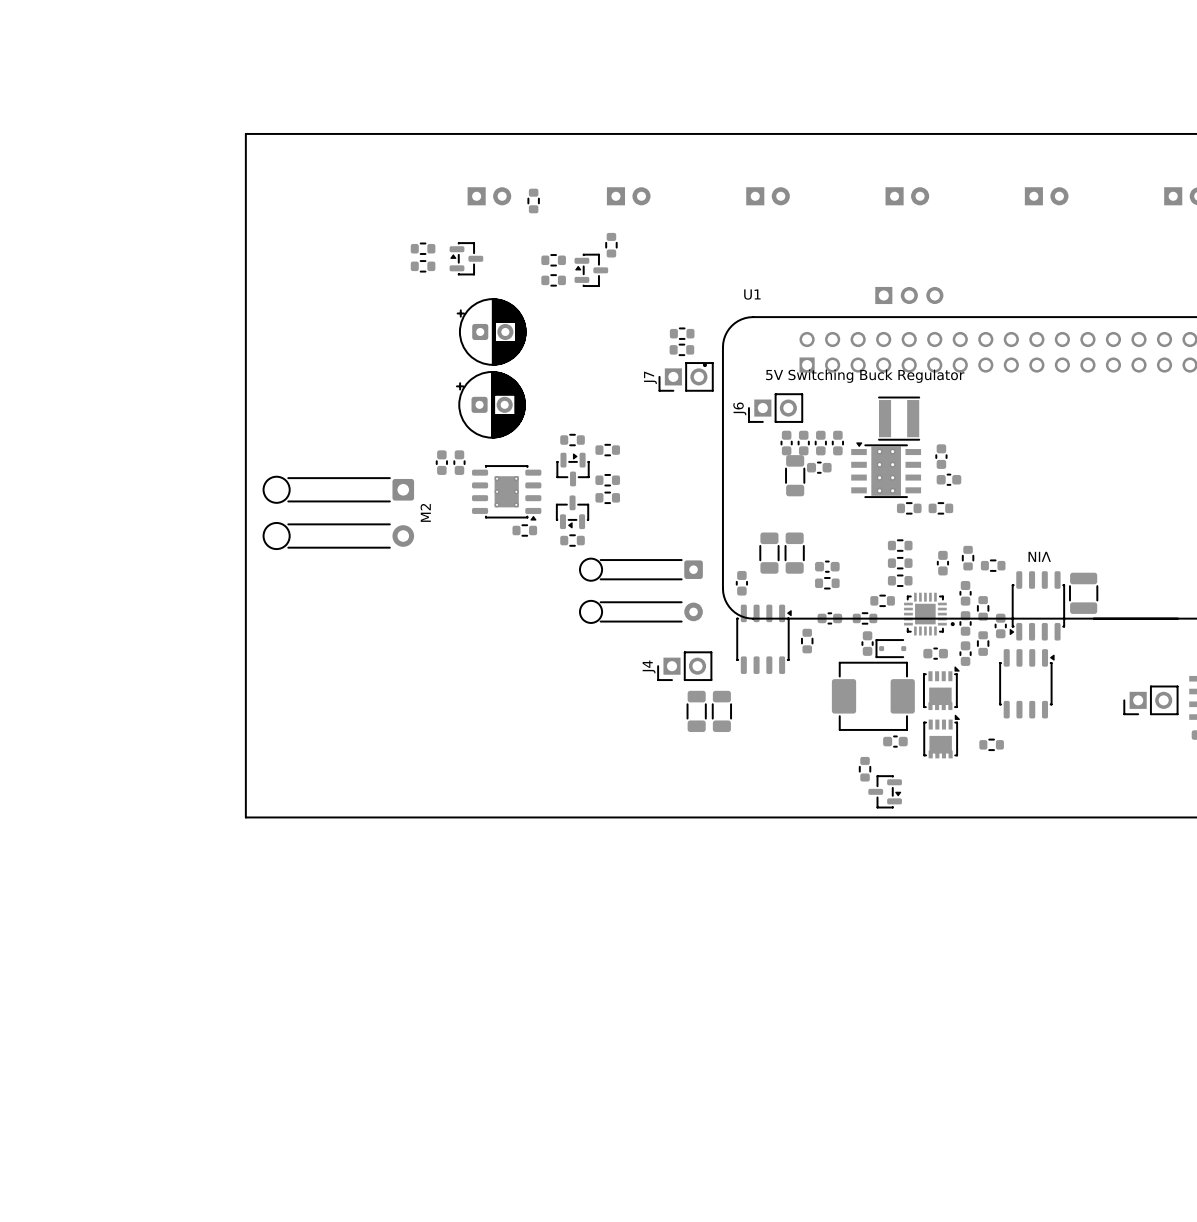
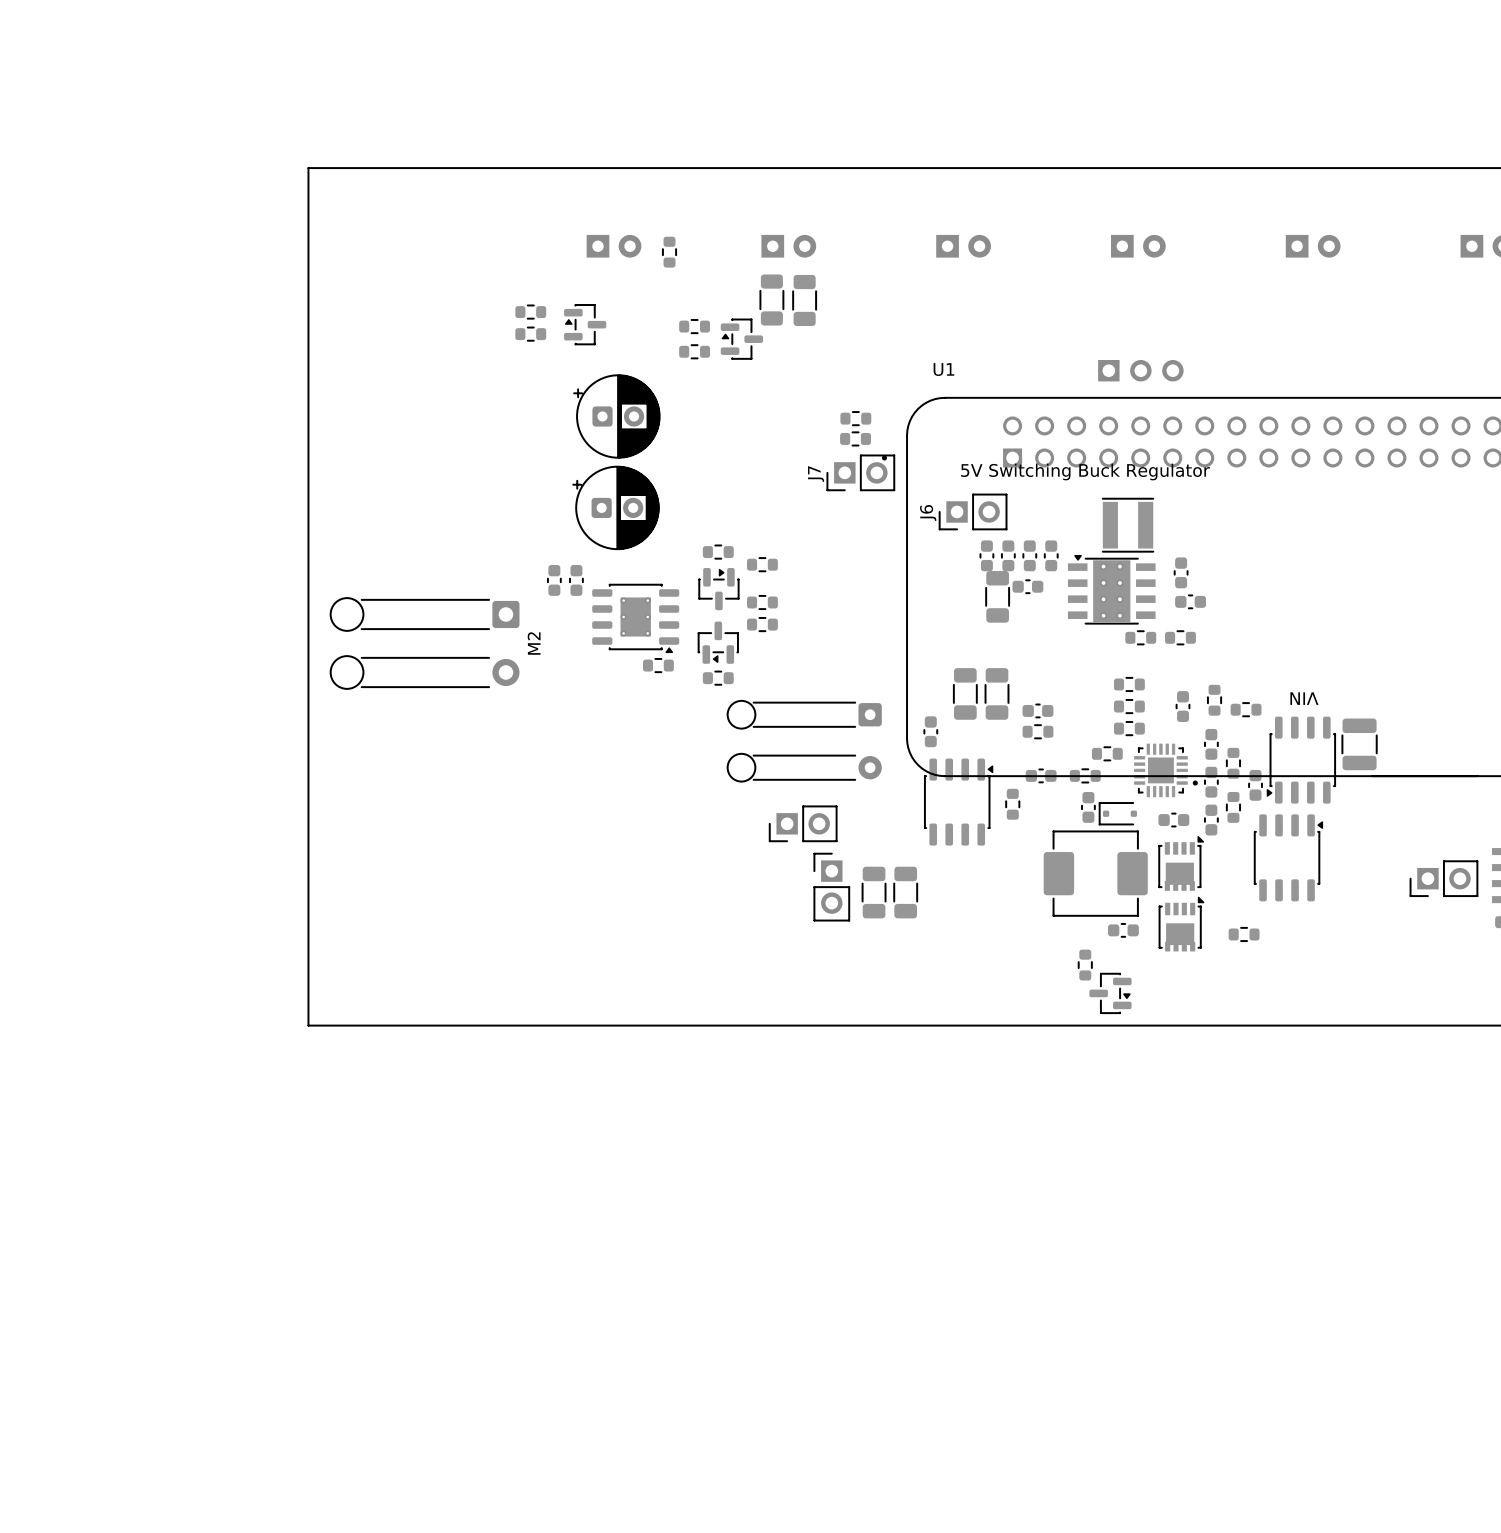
part footprint: [605, 232, 618, 258] -> [759, 274, 785, 326]
part: none -> (804, 300)
part: none -> (803, 823)
J4: (684, 666) -> none
part: none -> (831, 887)

